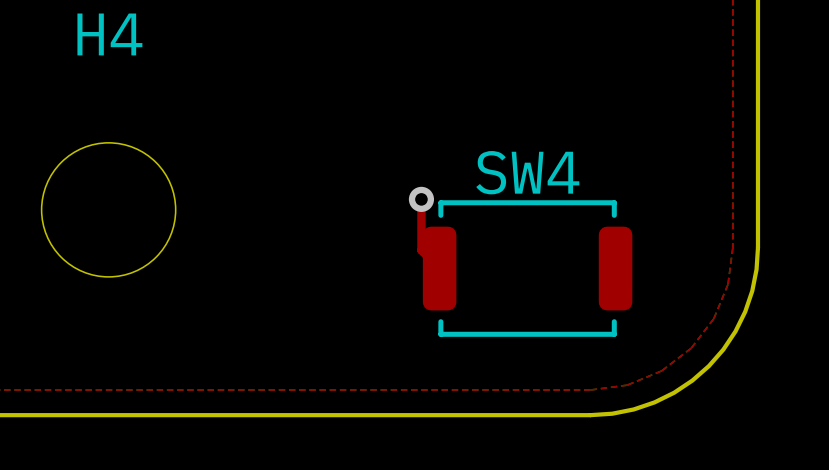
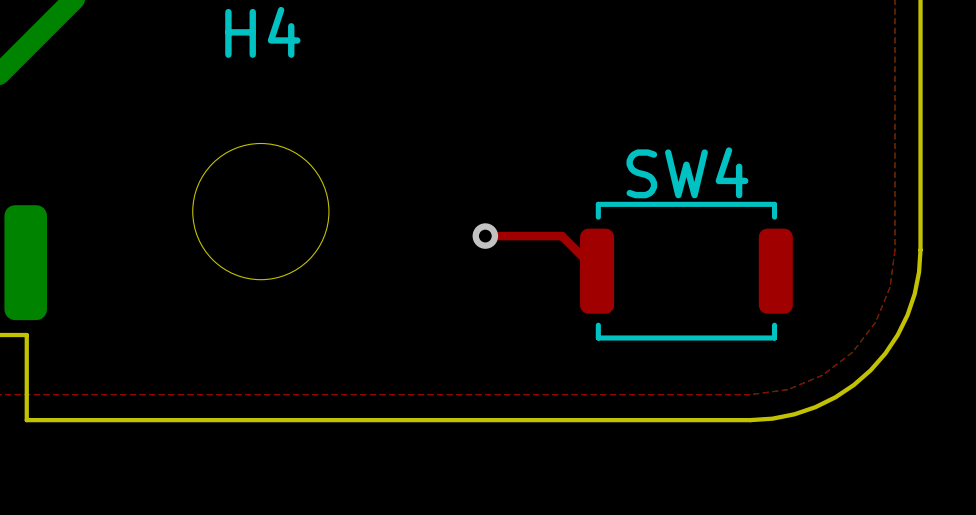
top track: (421, 199) (421, 250) -> (485, 236) (561, 236) (578, 252)
via position: (421, 199) -> (485, 236)

